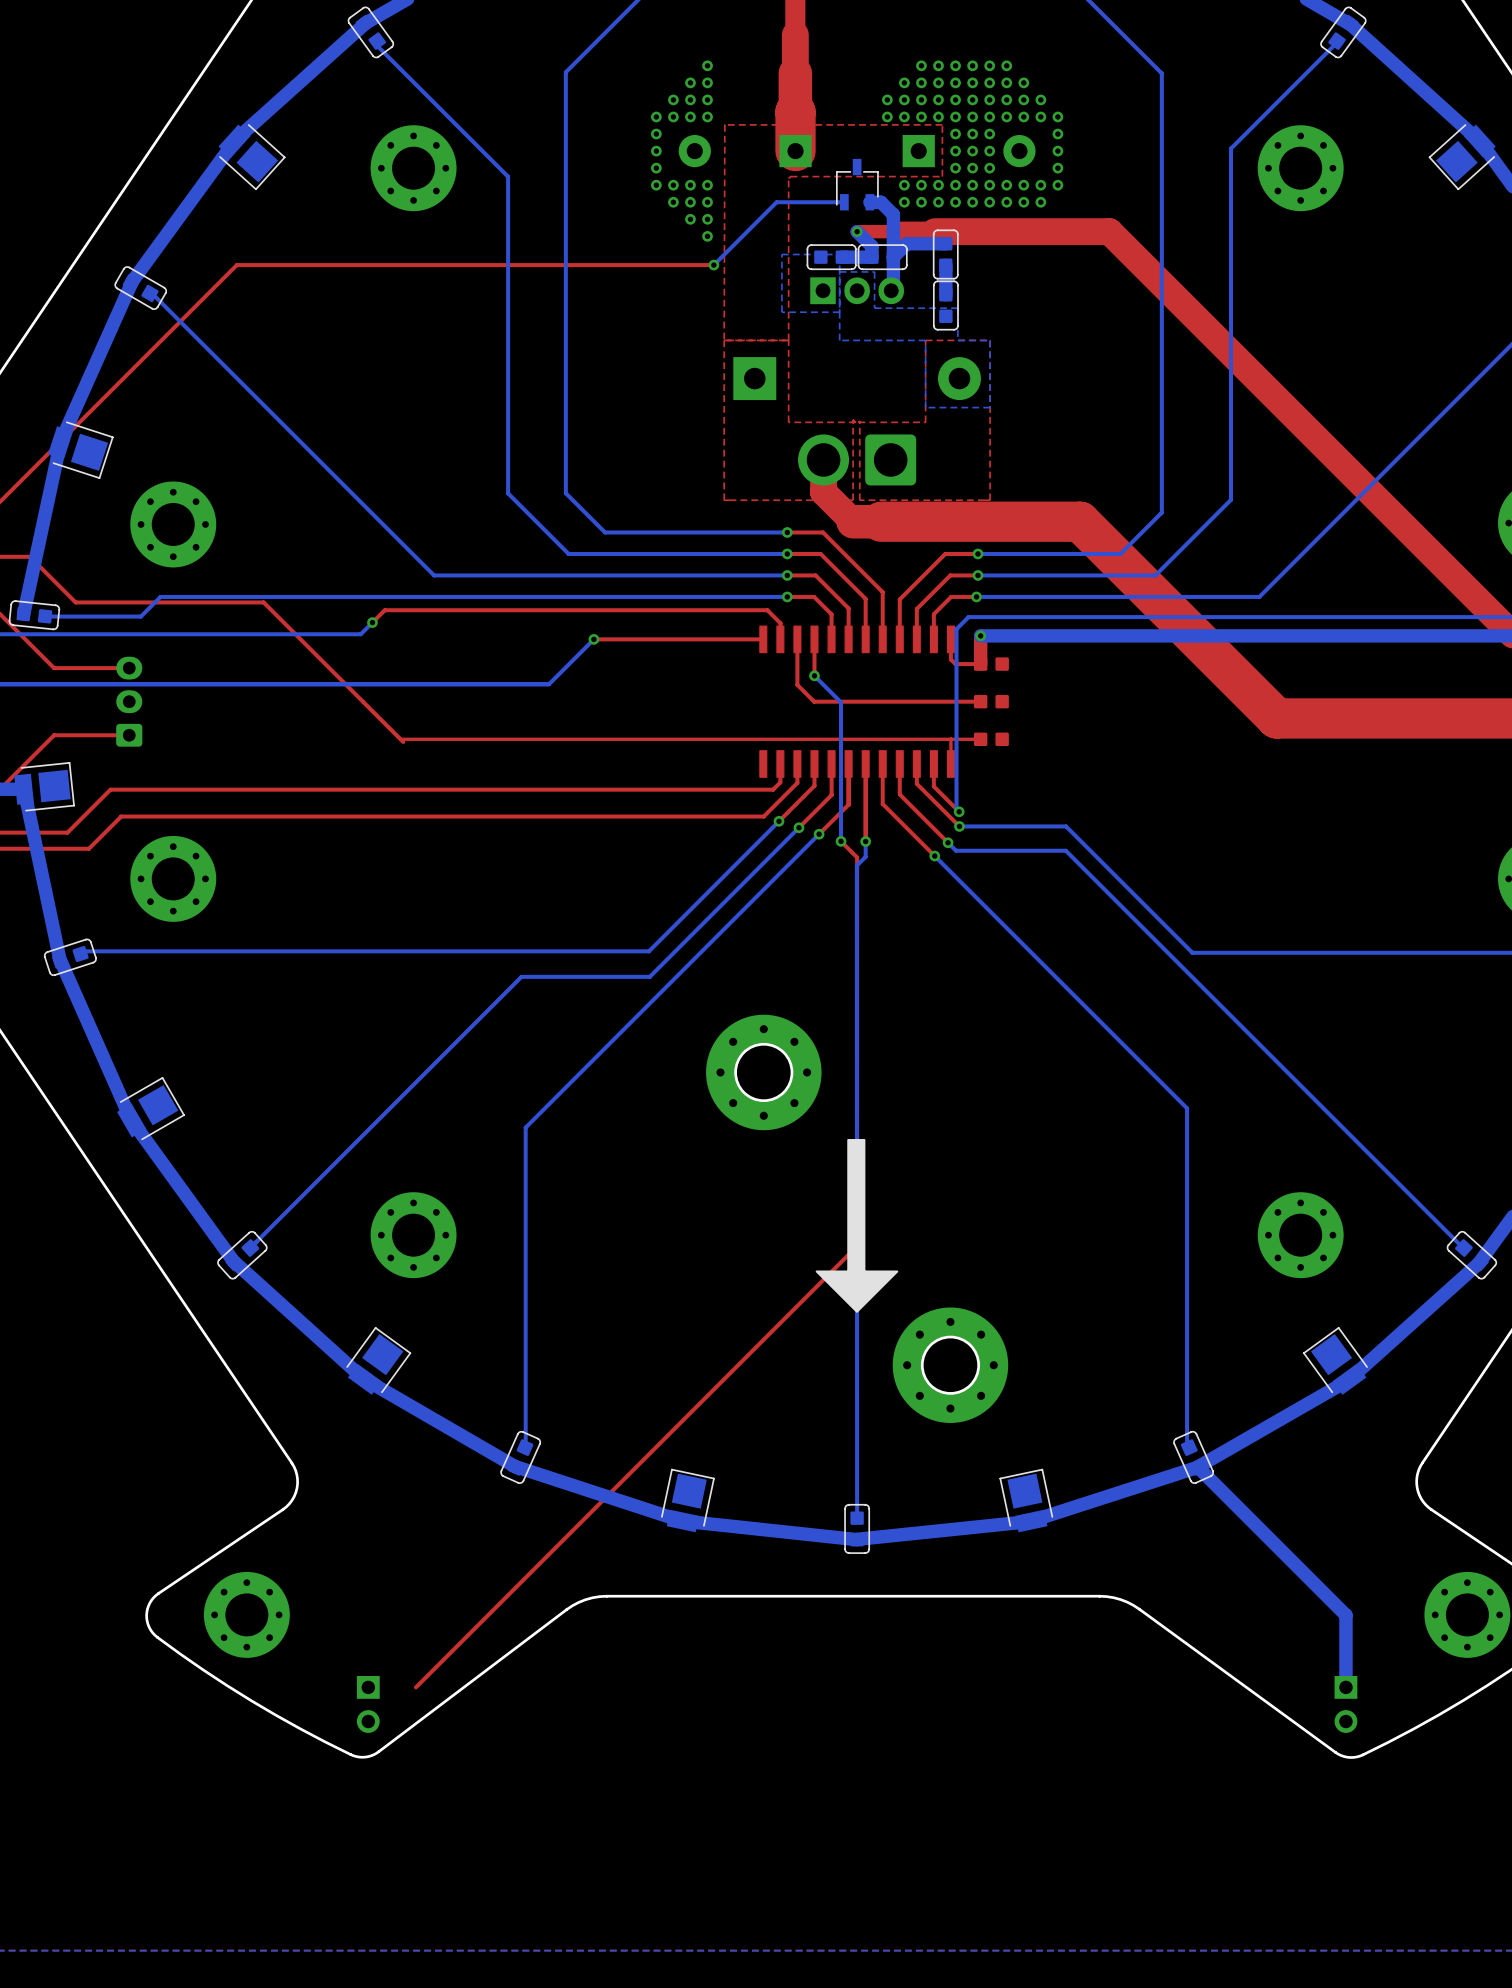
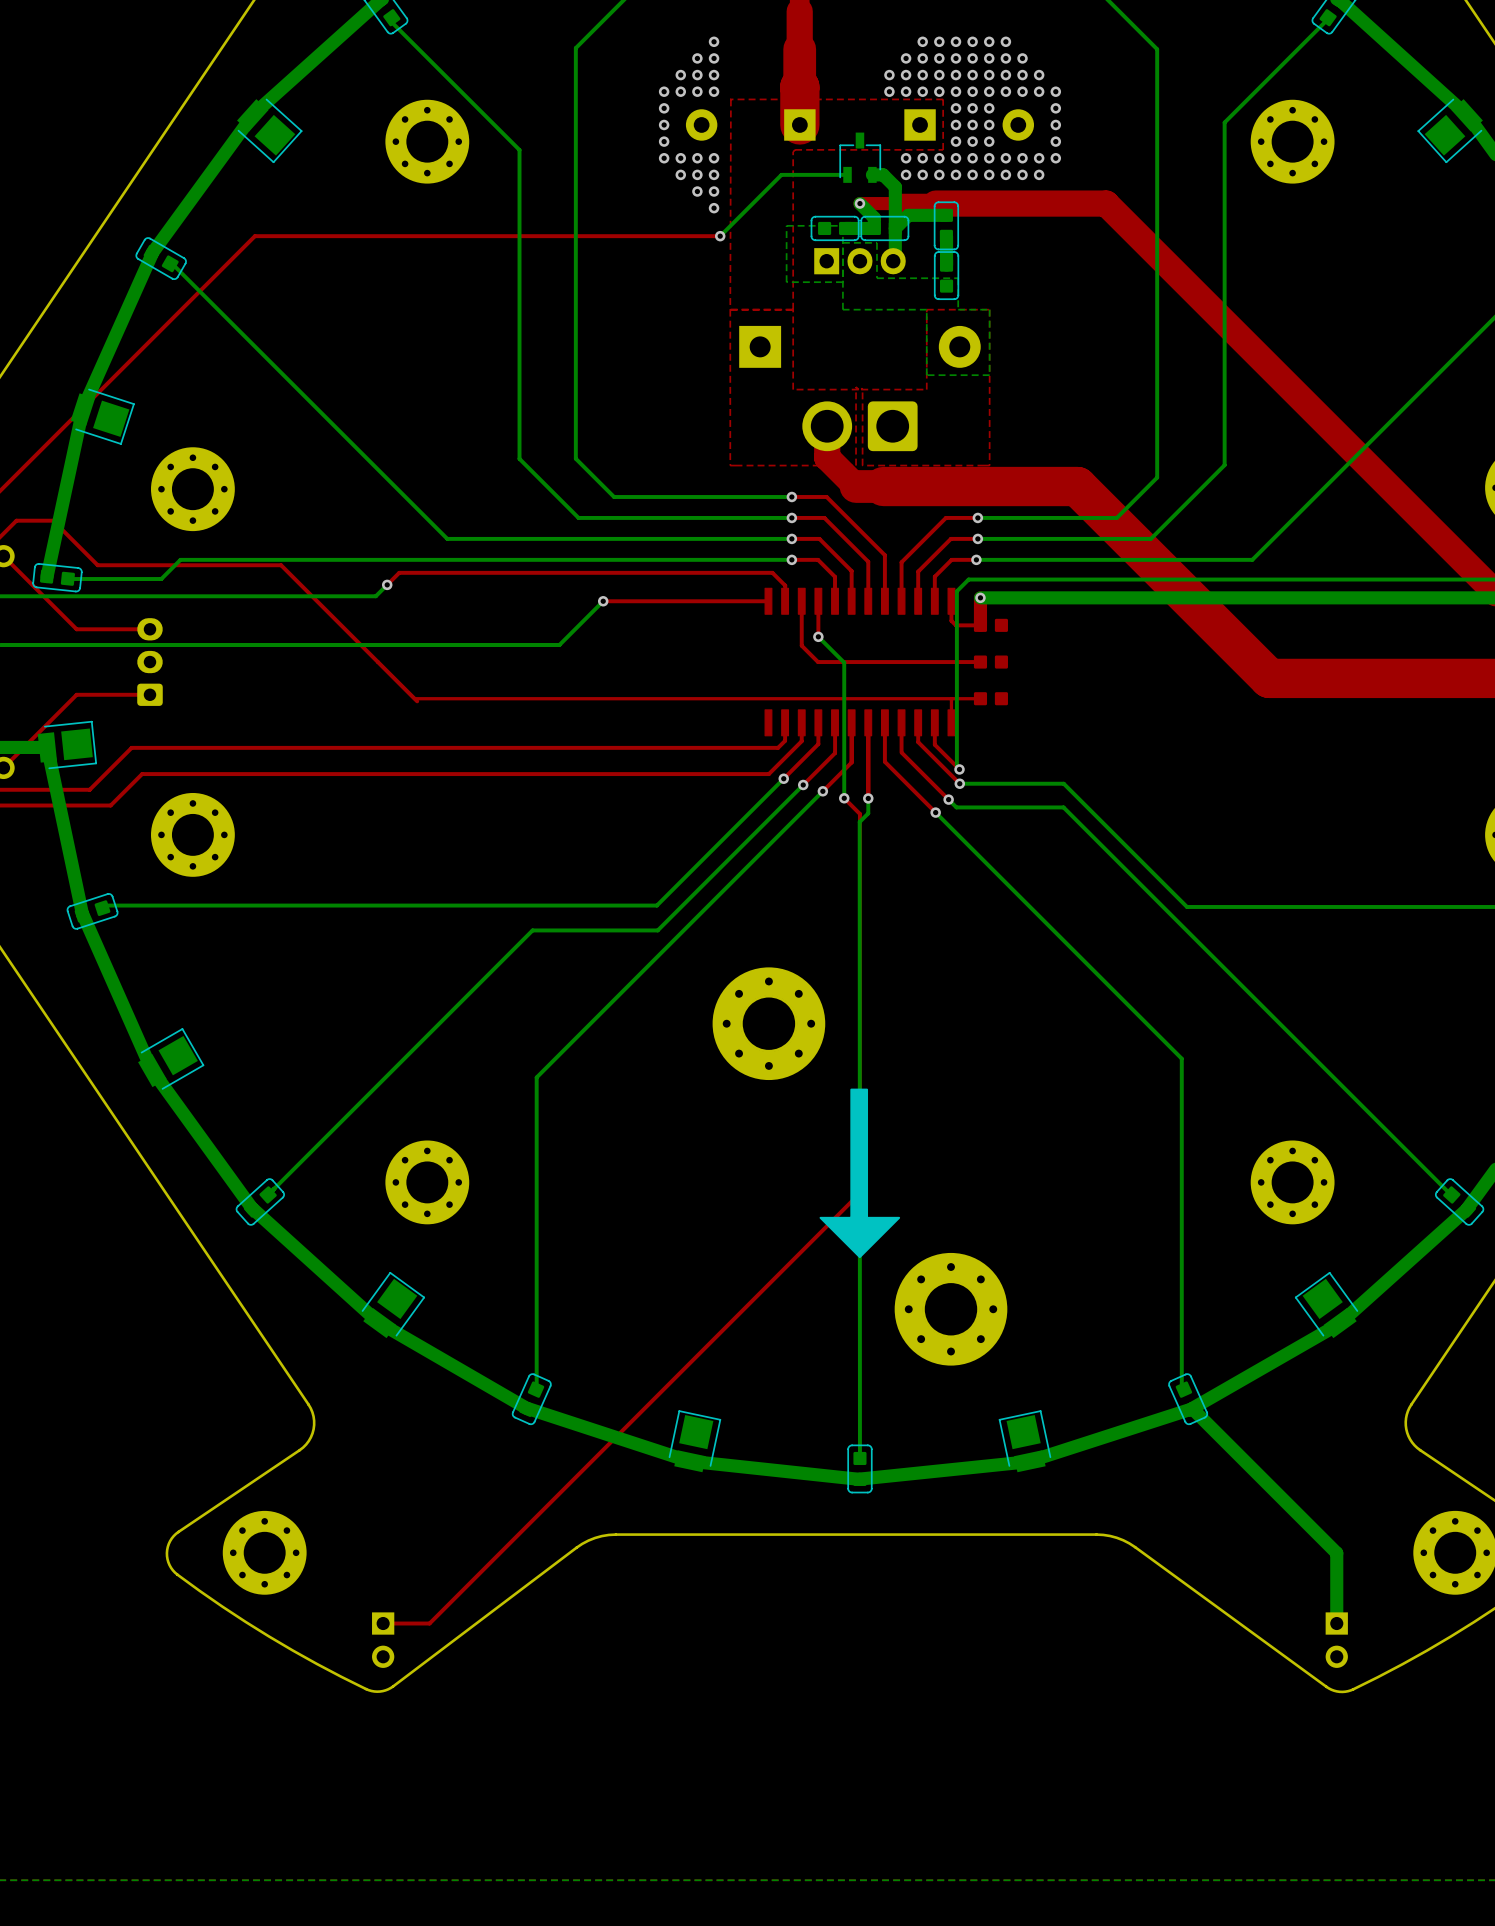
top track: none -> (429, 1623) (383, 1623)

